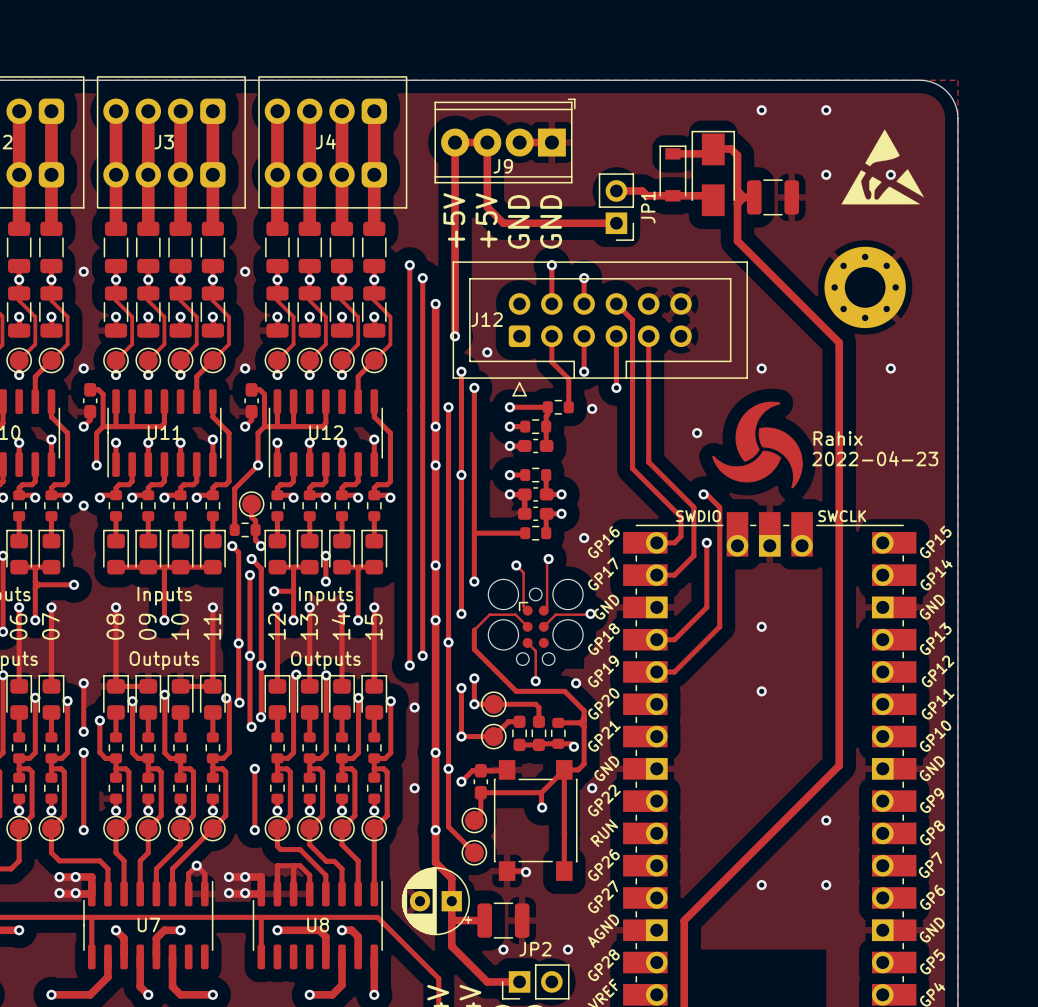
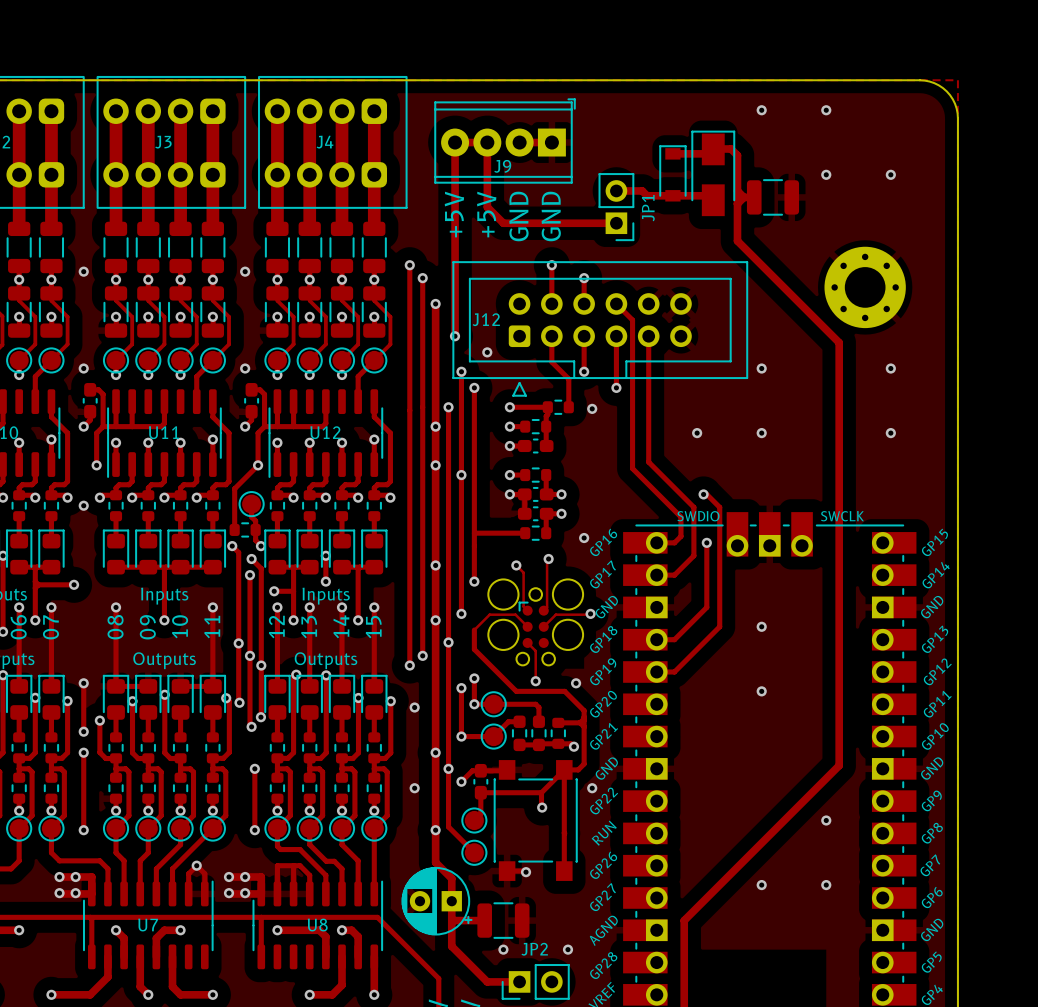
drawing: [841, 129, 924, 205] -> none
drawing: [712, 401, 803, 489] -> none
via: none -> (761, 433)
via: none -> (890, 433)
text: Rahix (838, 438) -> none
text: 2022-04-23 (875, 458) -> none

